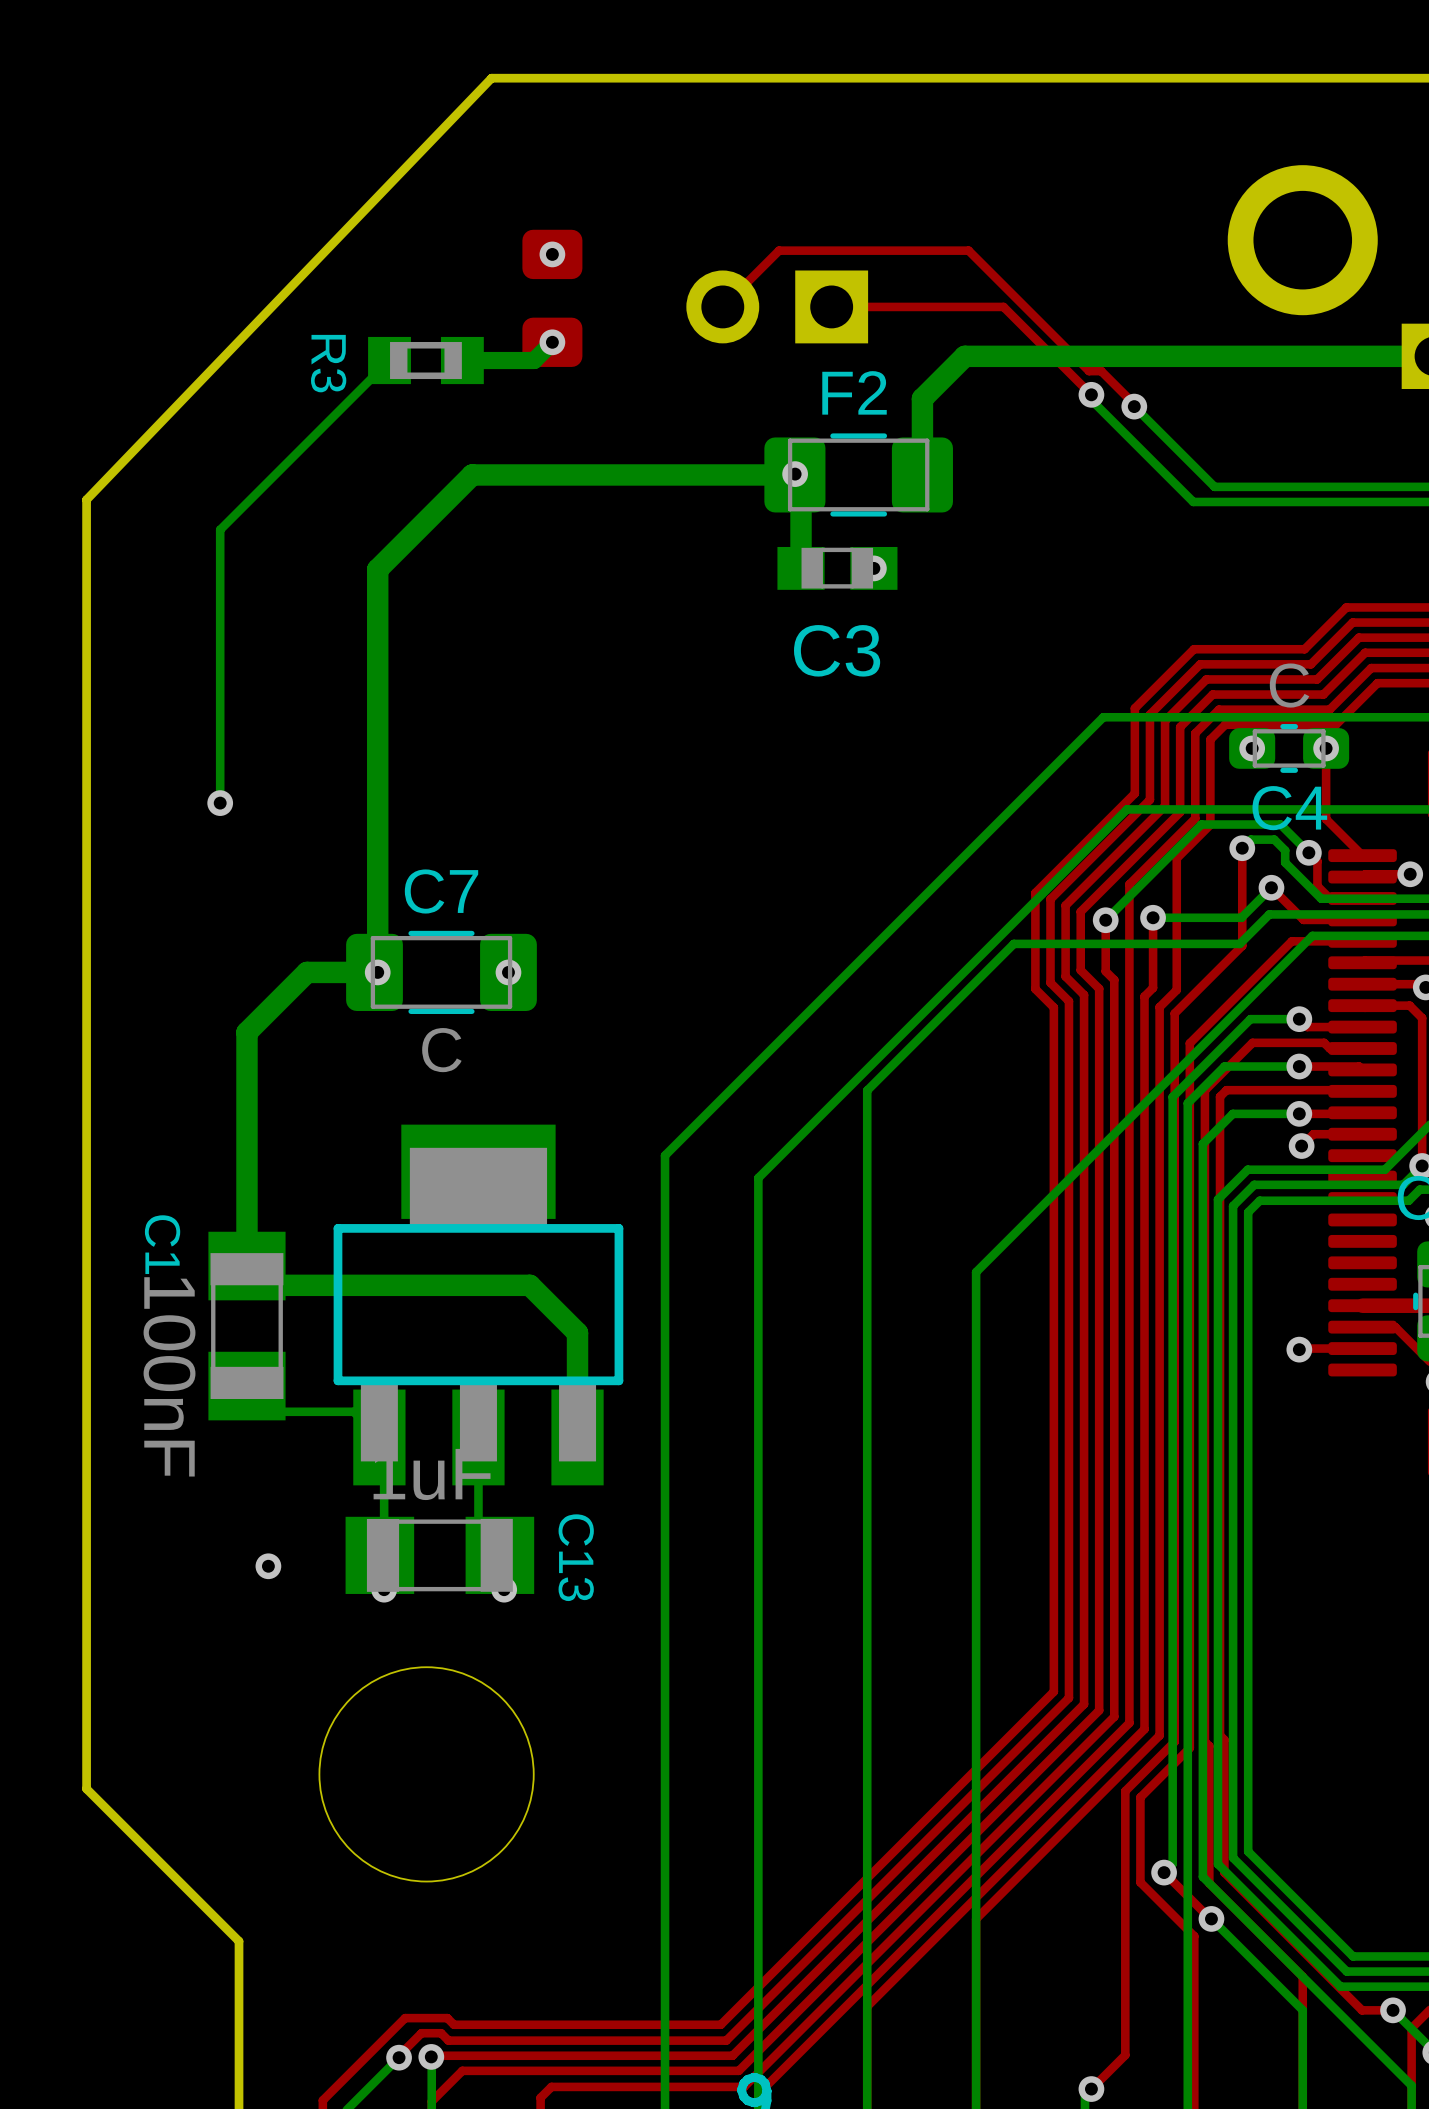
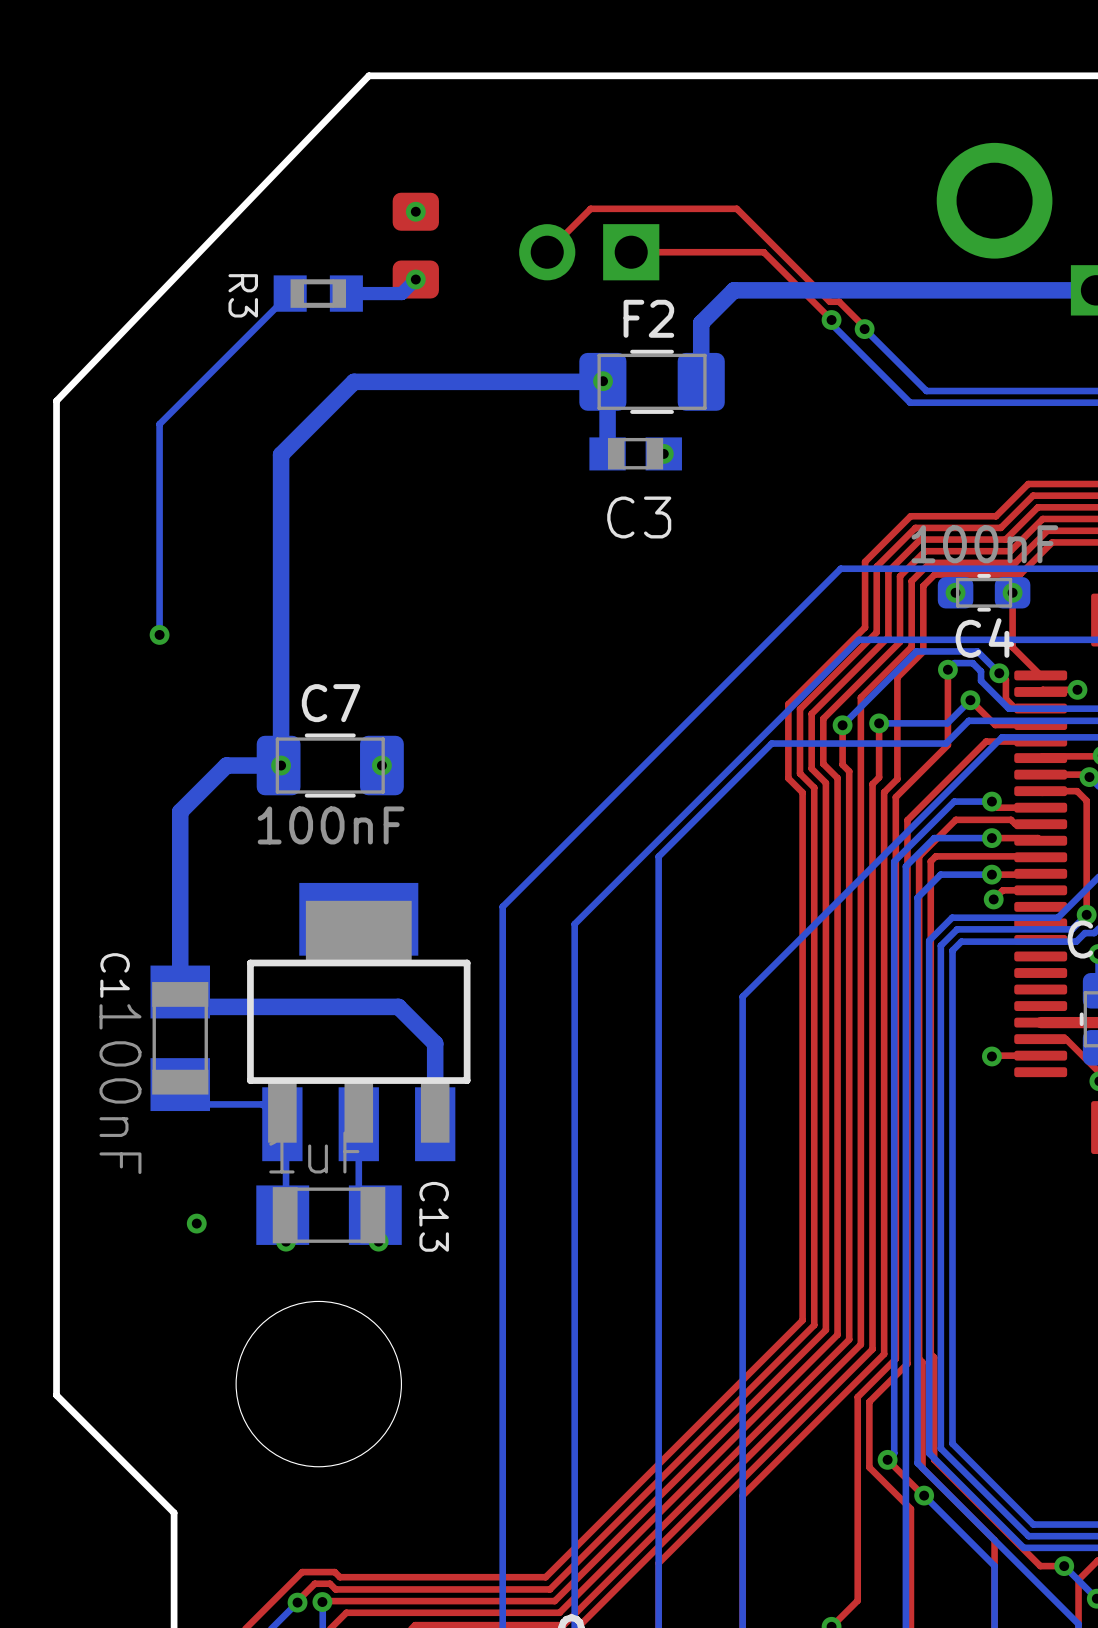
C4 value: C (1289, 685) -> 100nF (984, 544)
C7 value: C (441, 1050) -> 100nF (331, 825)

